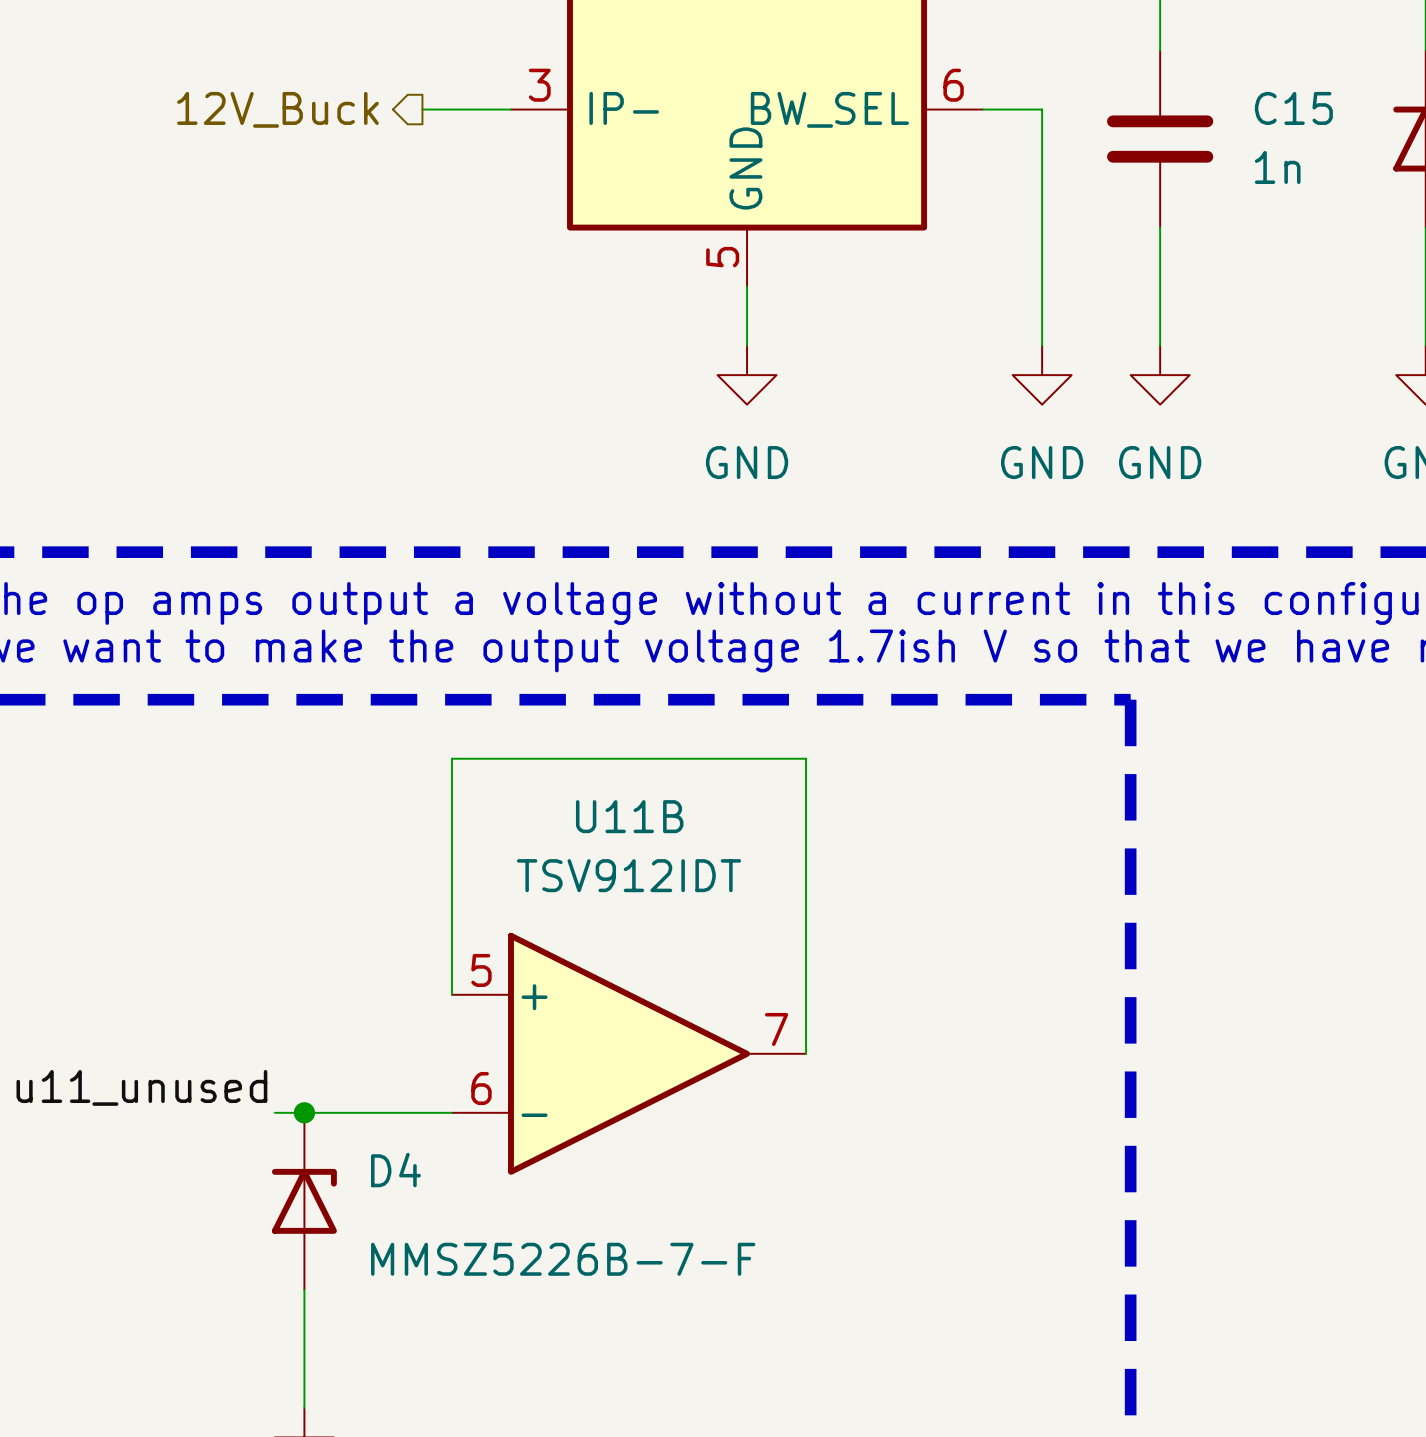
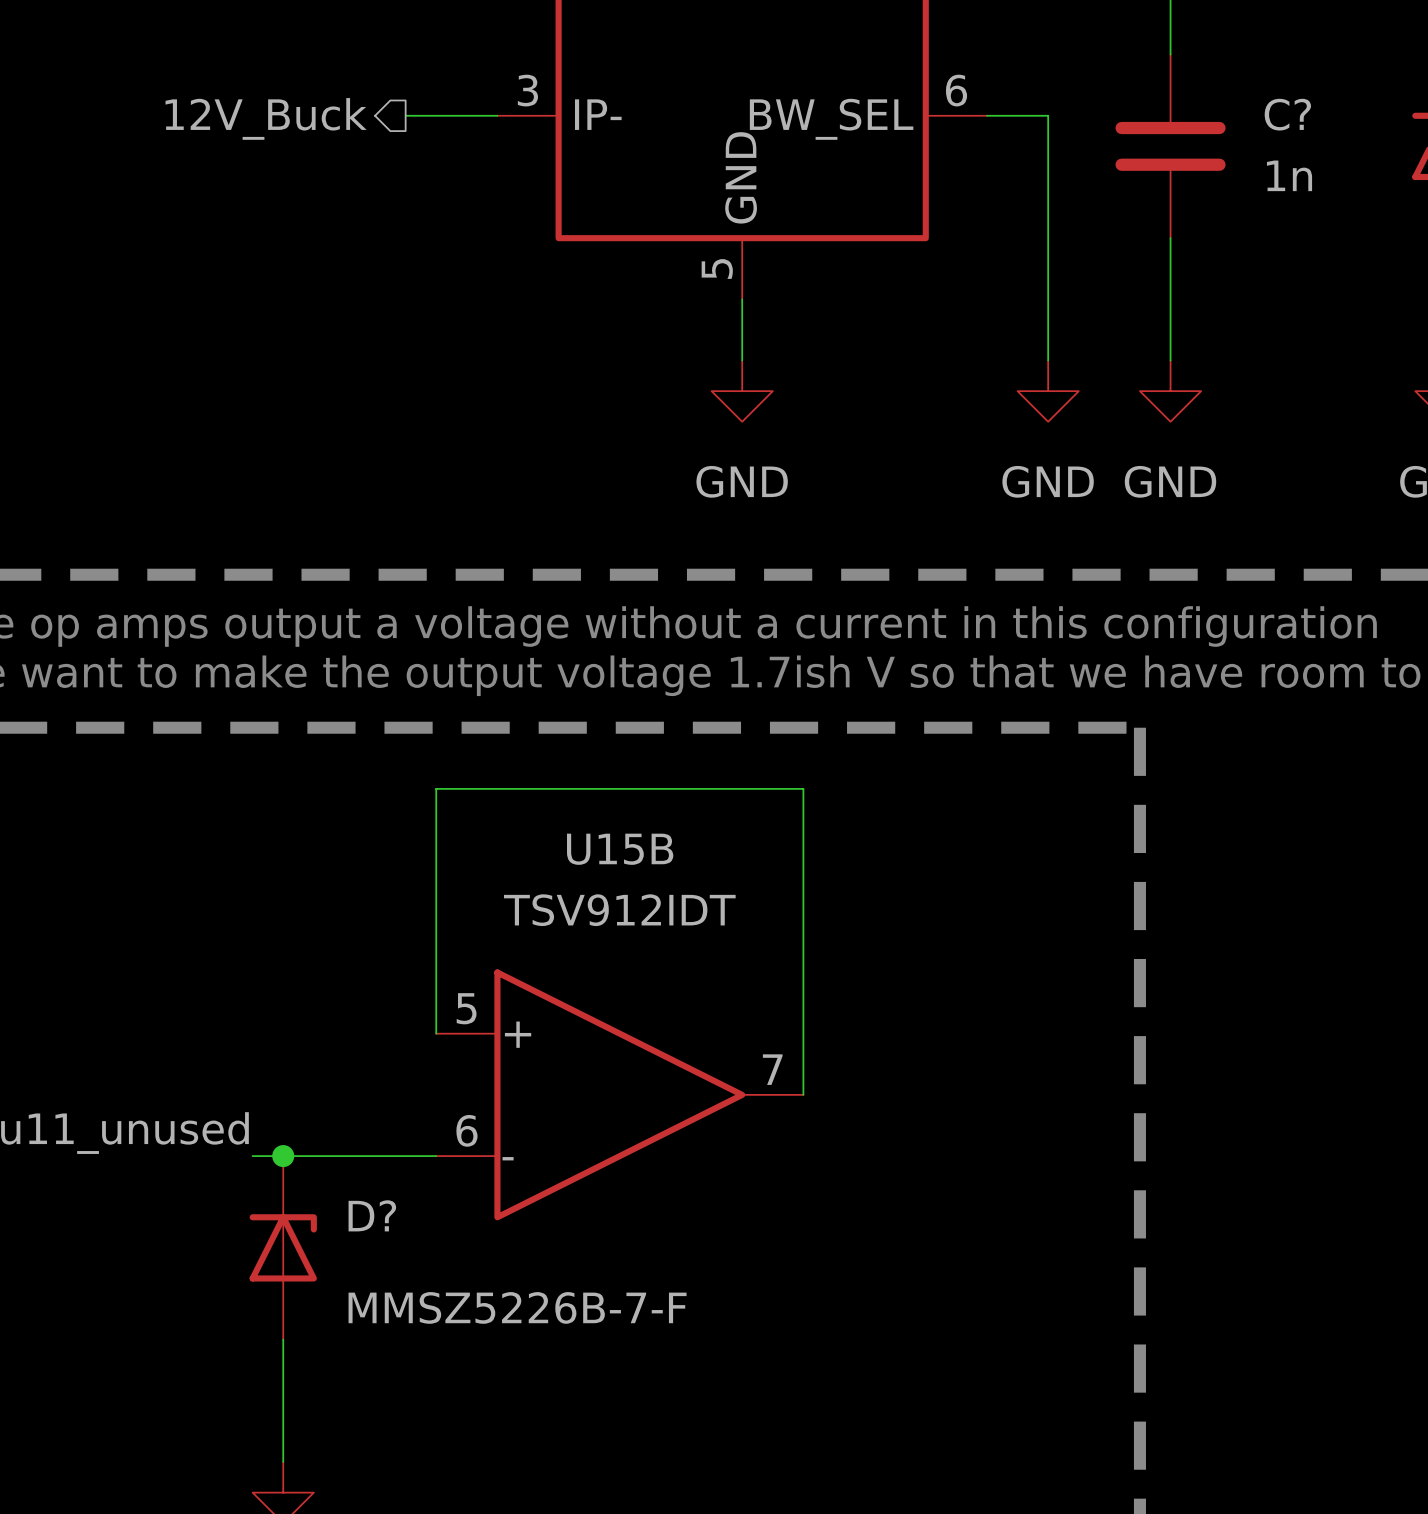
C15 name: C15 (1293, 108) -> C? (1287, 114)
U11B name: U11B (629, 816) -> U15B (620, 849)
D4 name: D4 (395, 1170) -> D? (372, 1215)

